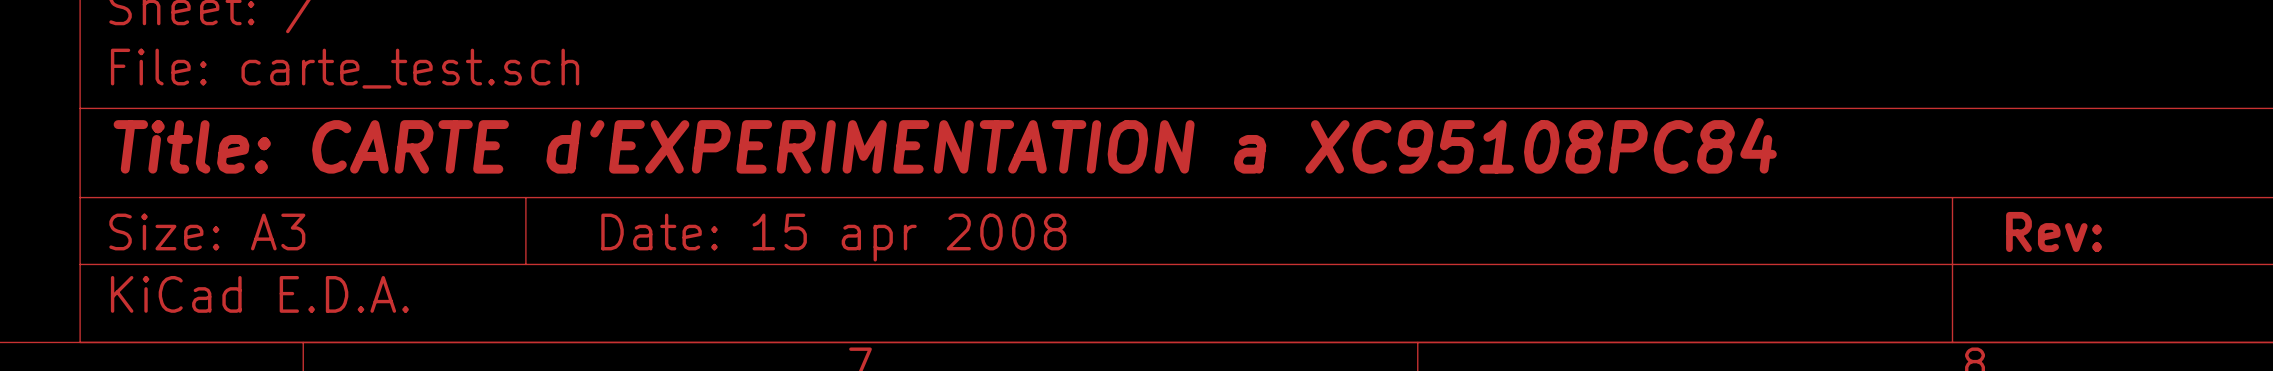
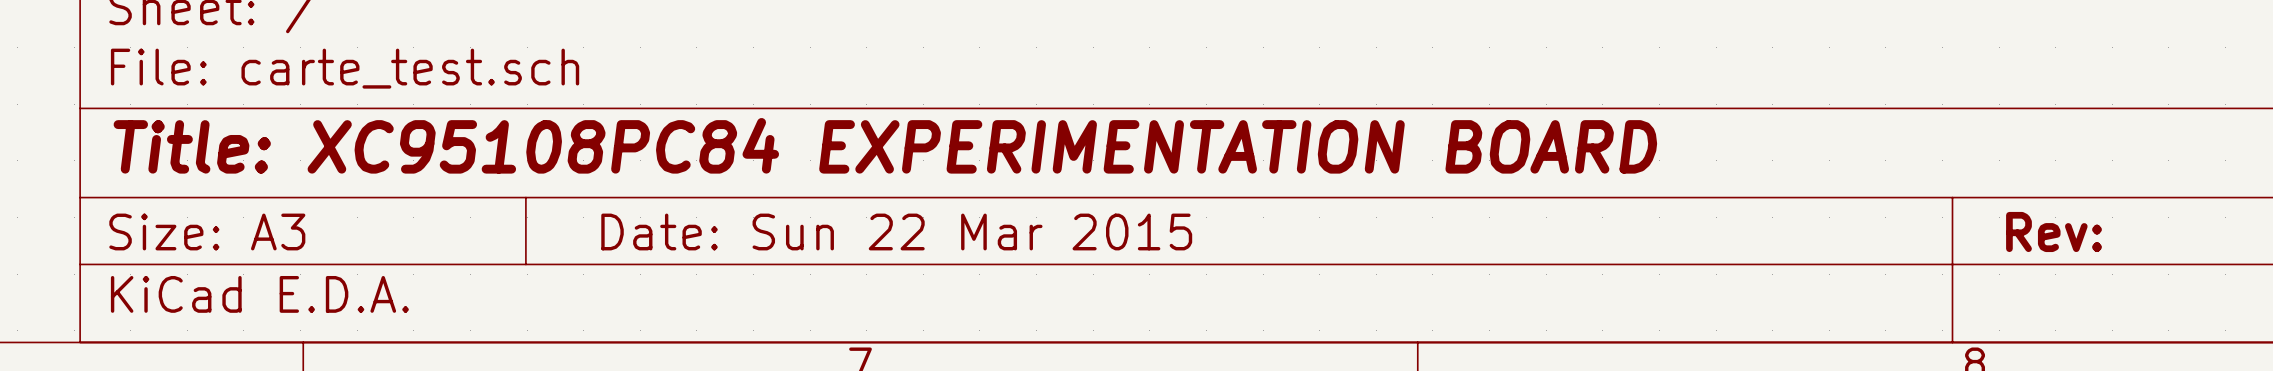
title block: Title: CARTE d'EXPERIMENTATION a XC95108PC84 (945, 145) -> Title: XC95108PC84 EXPERIMENTATION BOARD (885, 145)
title block: Date: 15 apr 2008 (833, 237) -> Date: Sun 22 Mar 2015 (896, 231)

